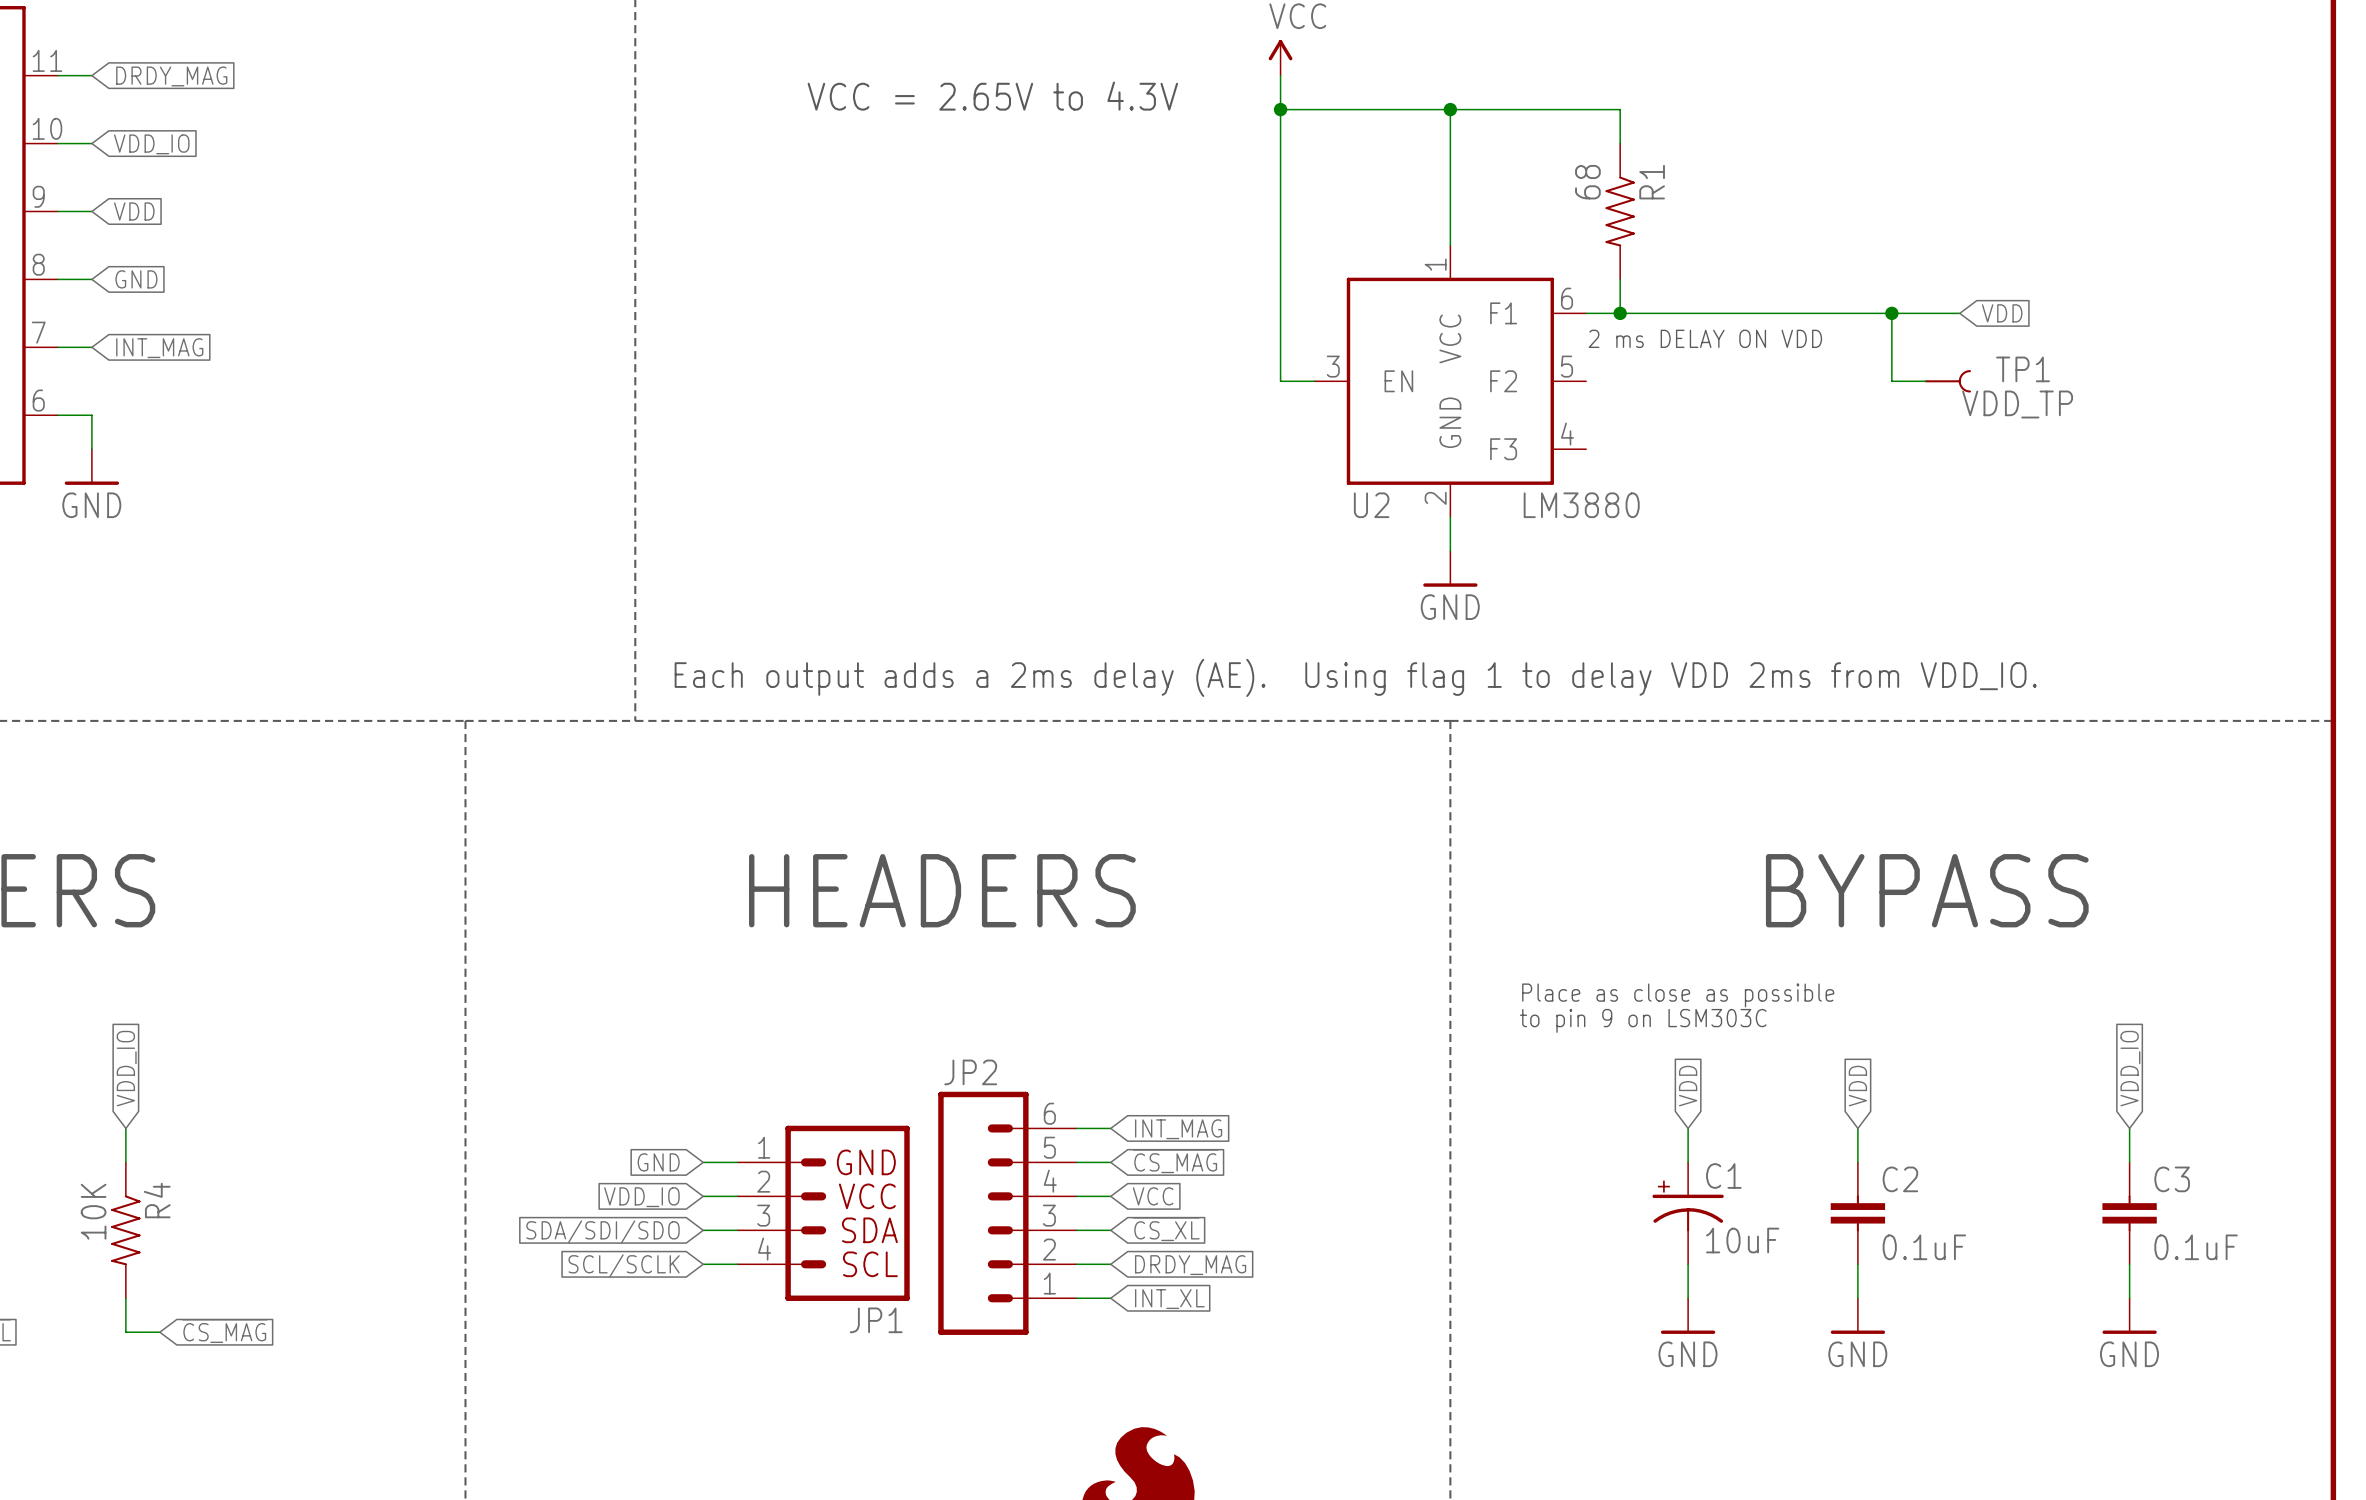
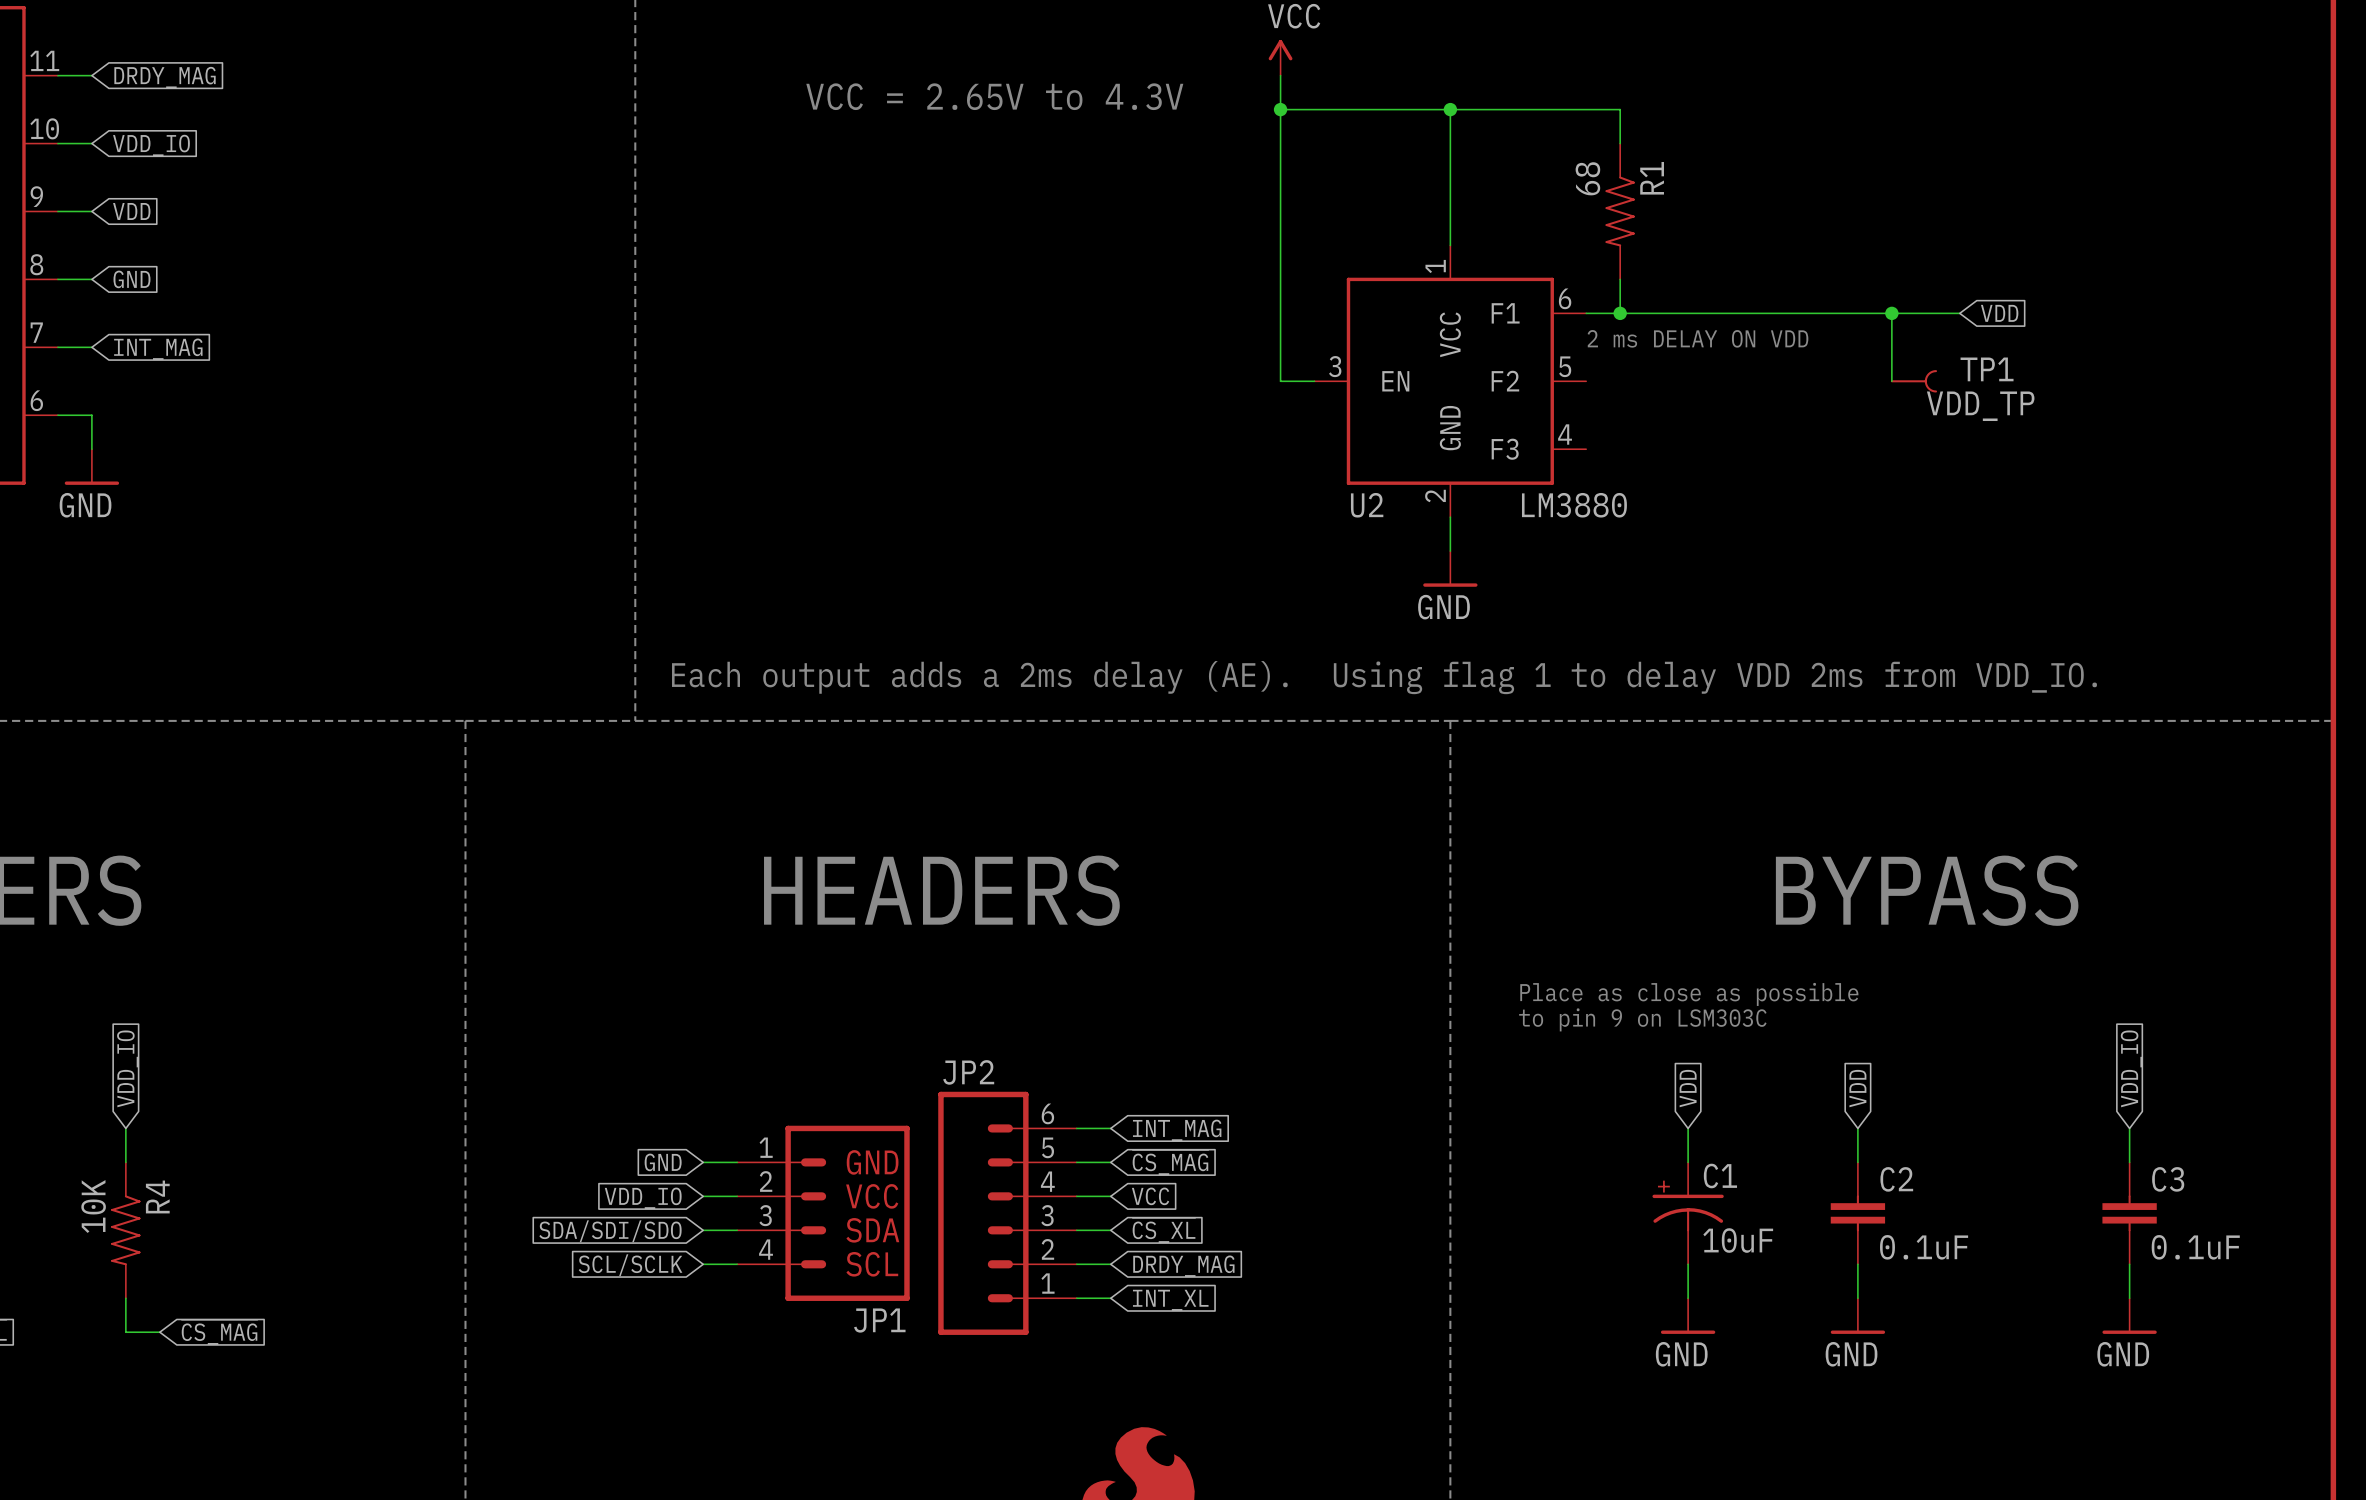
TP1 position: (1947, 381) -> (1913, 381)

